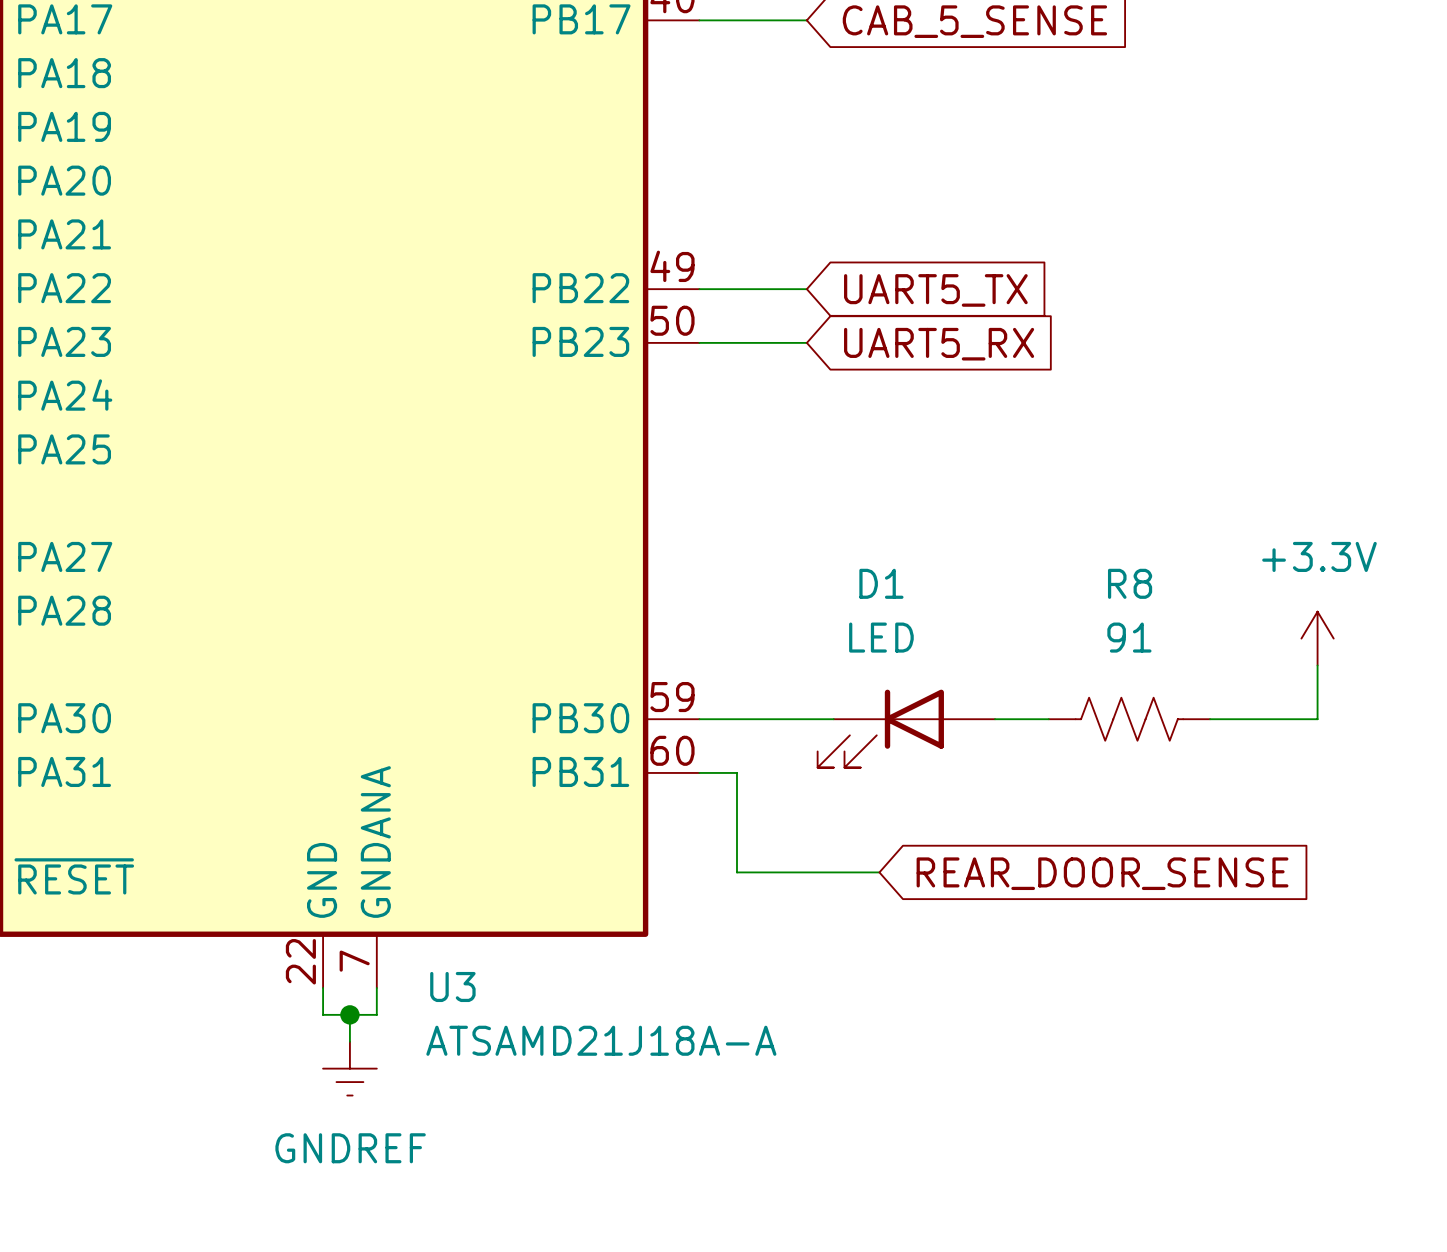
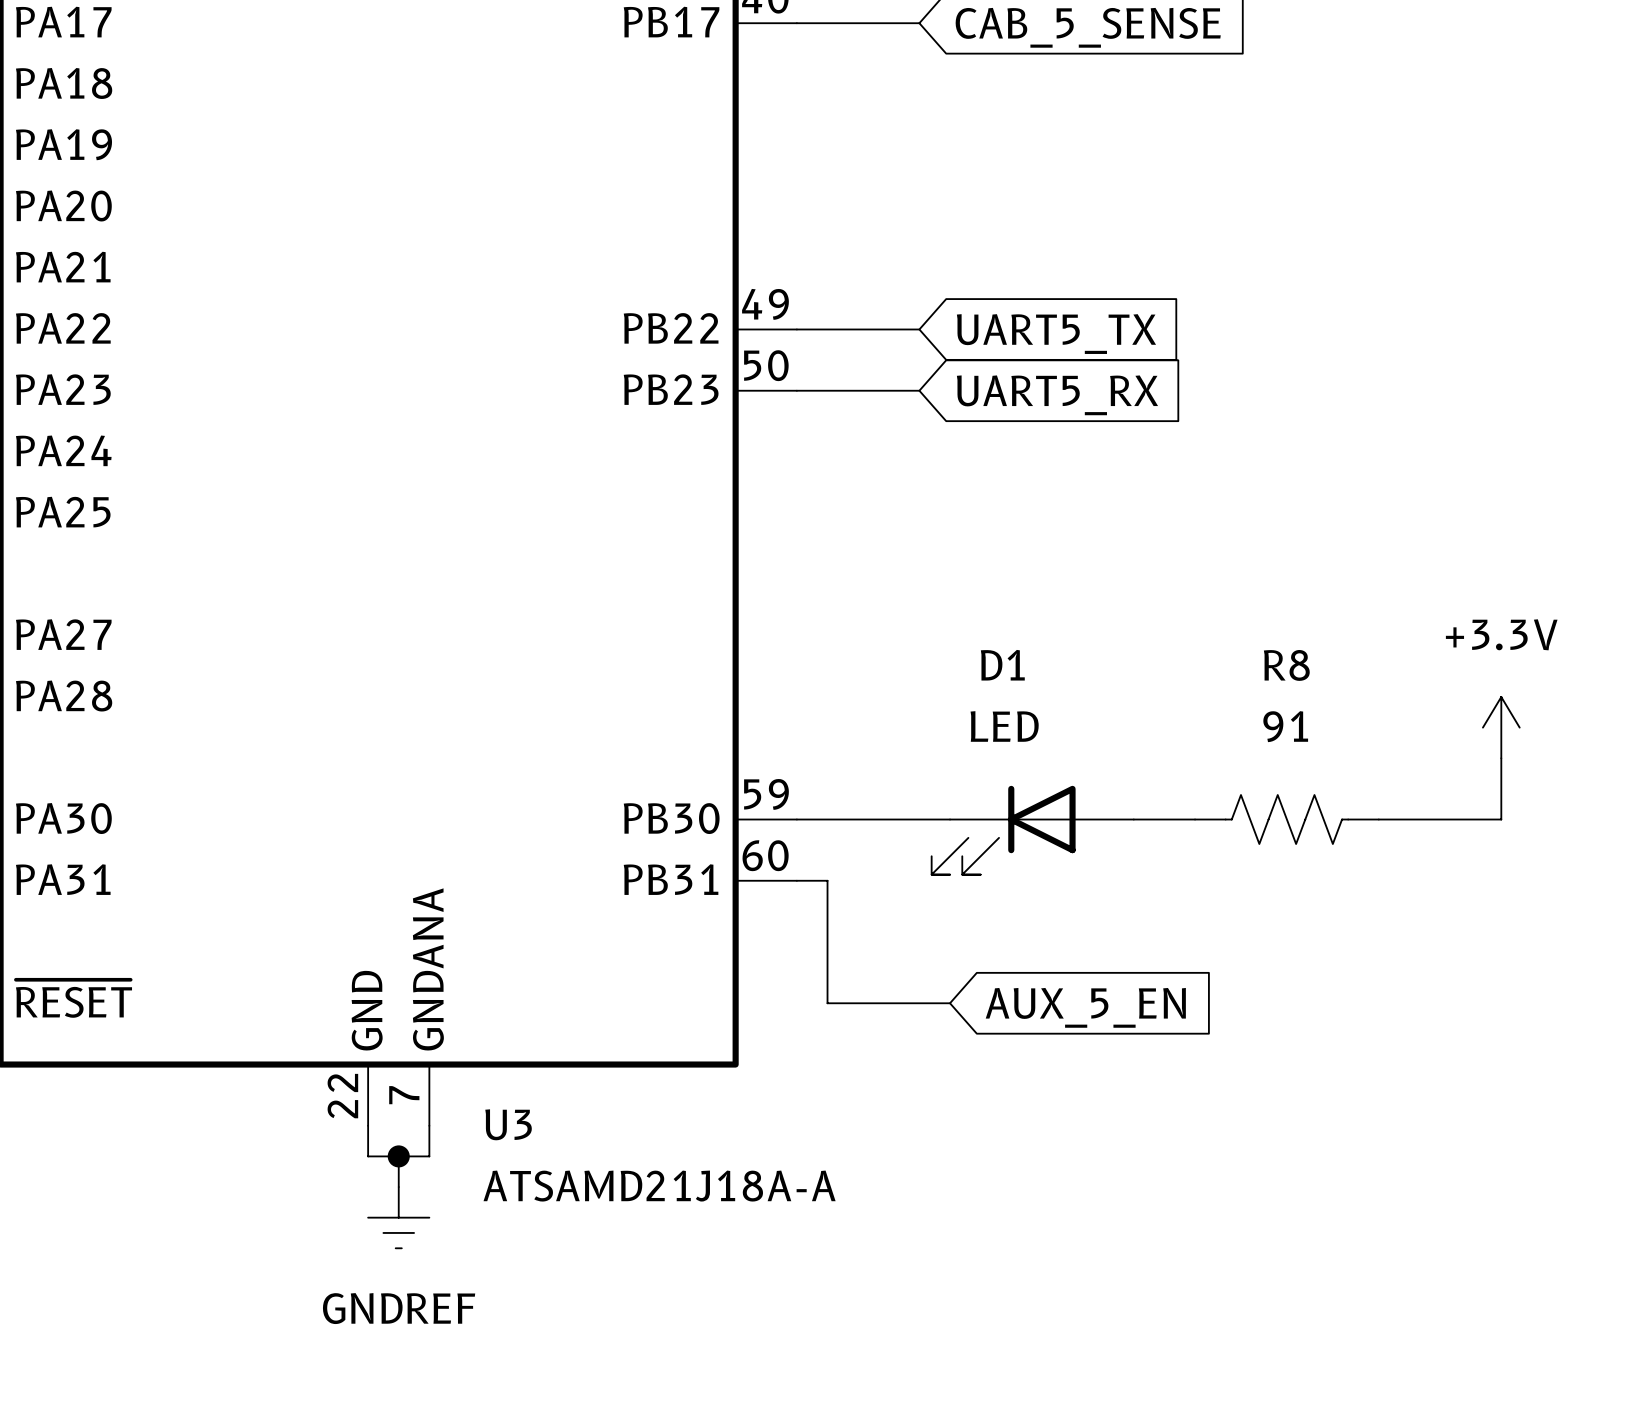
wire: (726, 772) (736, 772) (736, 872) (879, 872) -> (827, 880) (827, 1003) (950, 1003)
global label: REAR_DOOR_SENSE (1102, 873) -> none
global label: none -> AUX_5_EN (1085, 1007)

